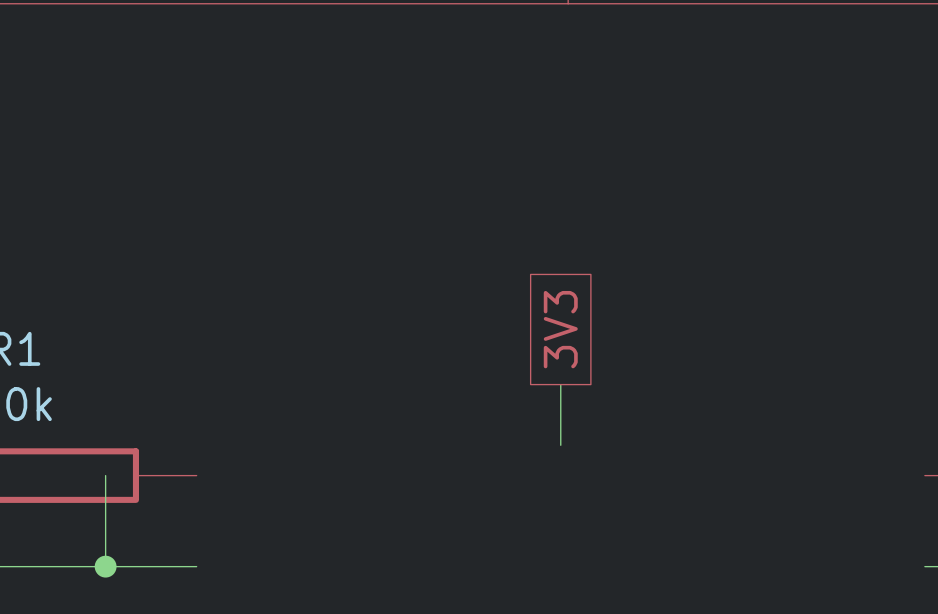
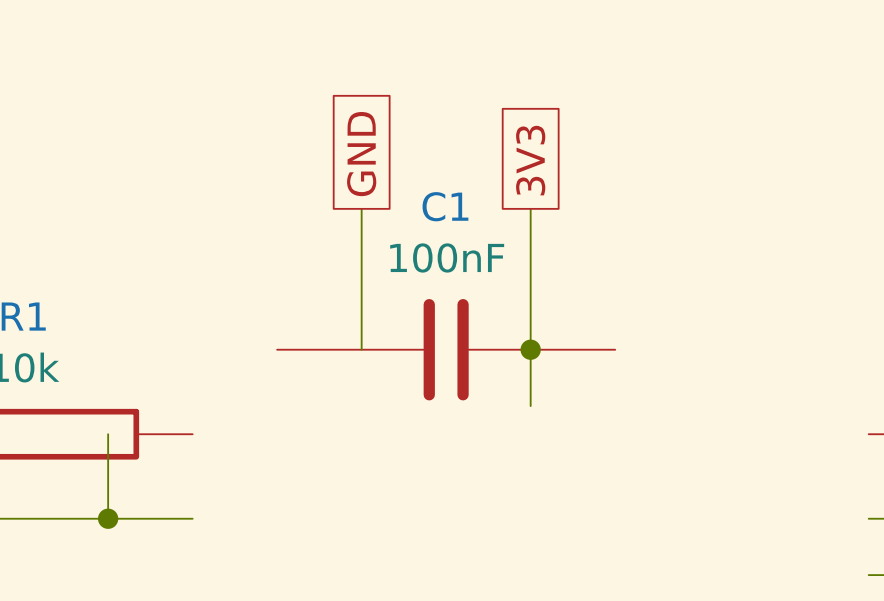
global label: none -> GND (361, 154)
wire: none -> (361, 208) (361, 349)
wire: none -> (530, 208) (530, 349)
global label position: 3V3 (560, 329) -> 3V3 (530, 160)
C1: none -> 100nF (446, 349)
junction: none -> (530, 349)

